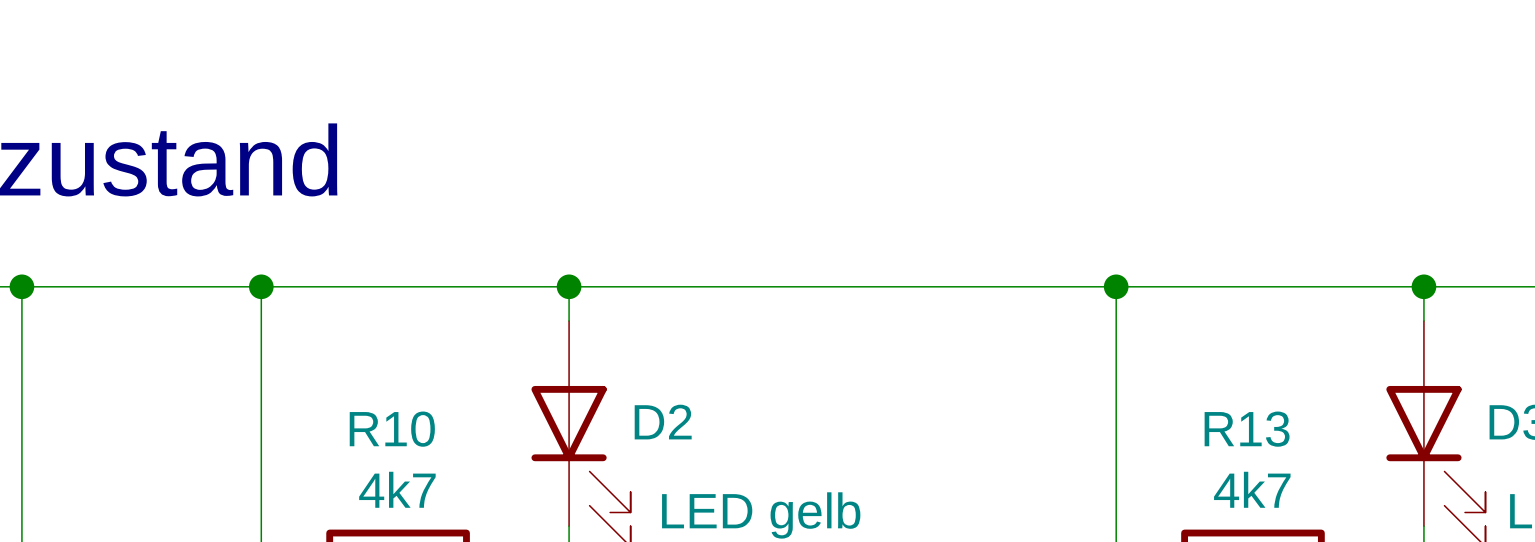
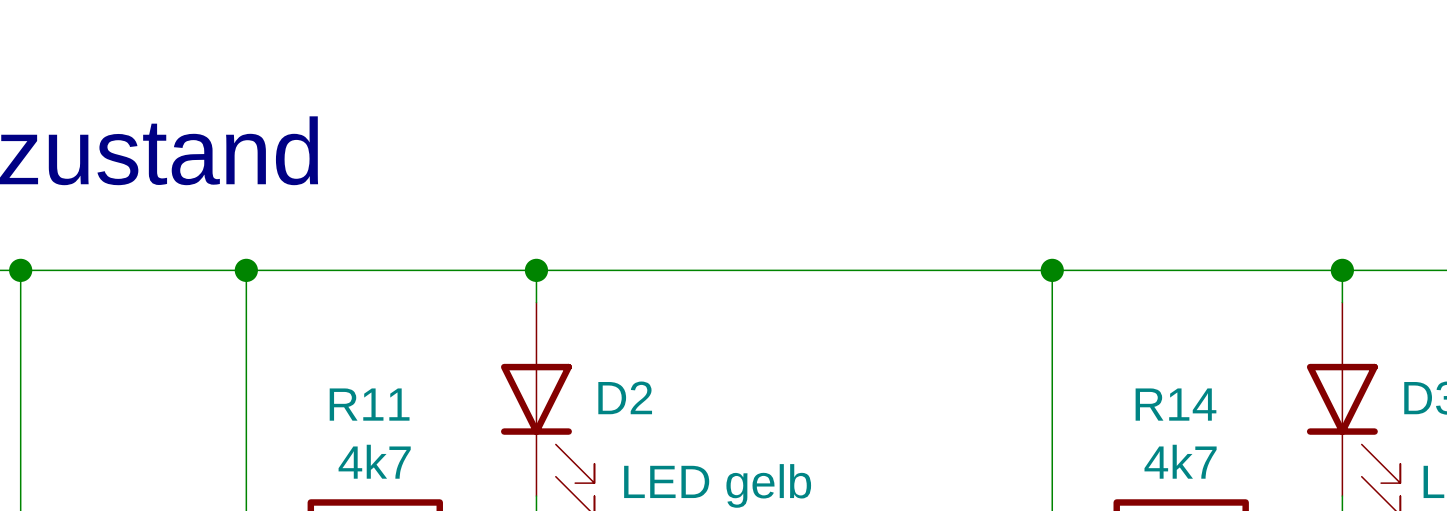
R10 name: R10 (392, 429) -> R11 (369, 404)
R13 name: R13 (1247, 429) -> R14 (1175, 404)

